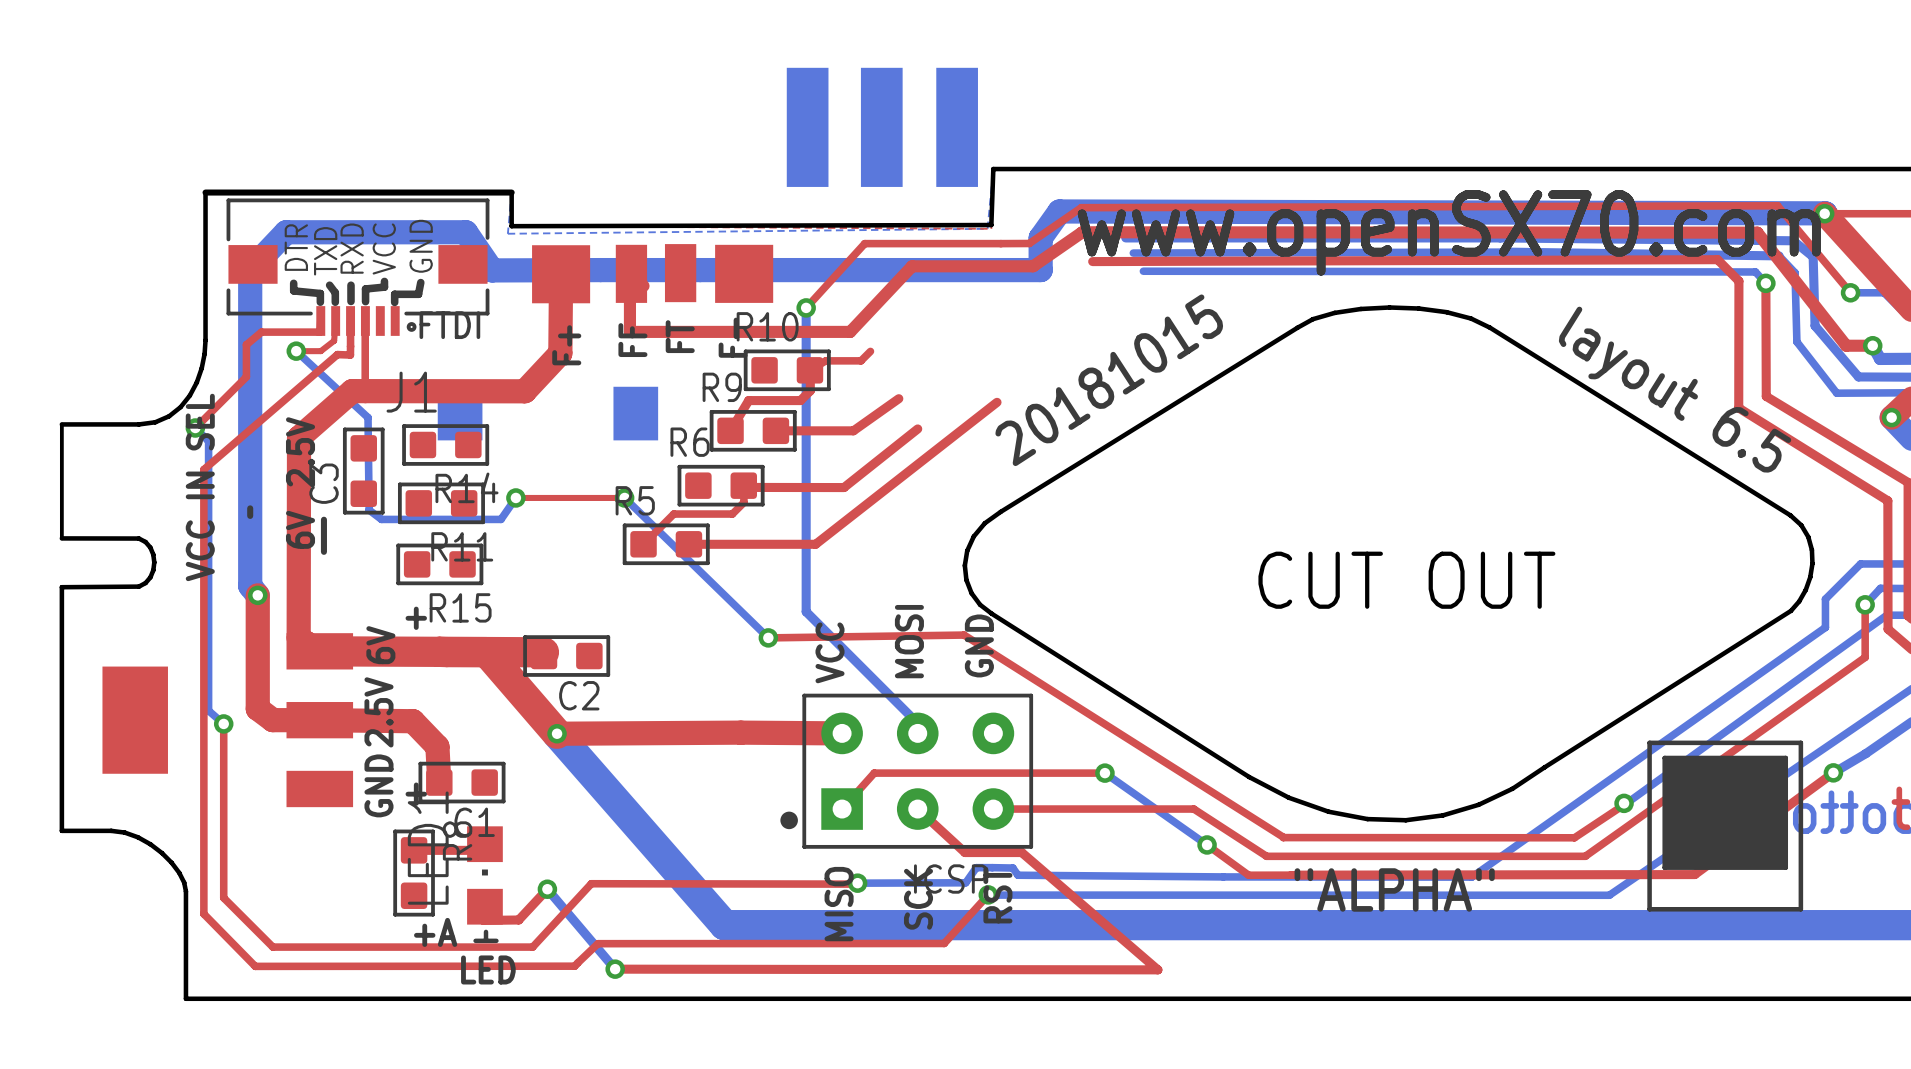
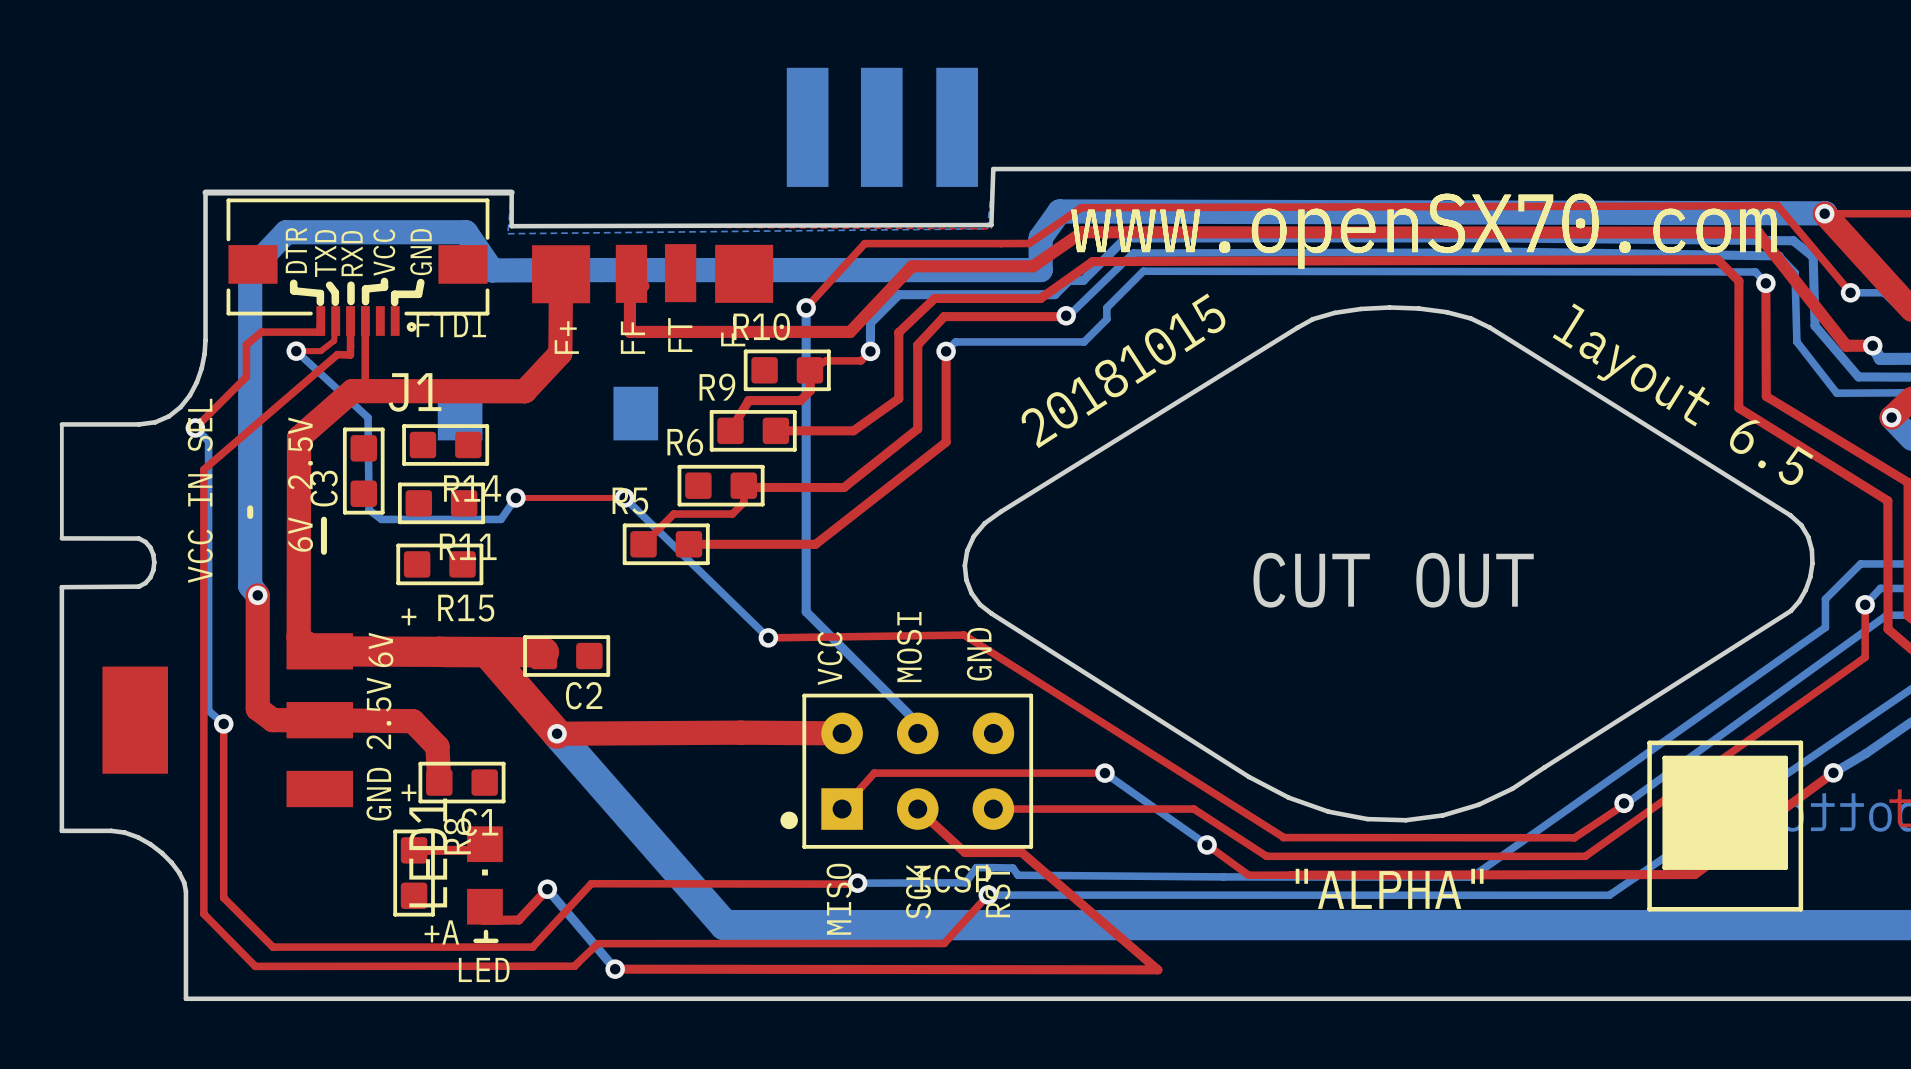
bottom track: none -> (1125, 237) (1083, 280) (1069, 280) (1054, 294) (898, 294) (870, 323) (870, 351)
bottom track: none -> (1133, 253) (1070, 313) (1066, 315)
top track: none -> (1092, 261) (1040, 298) (934, 298) (898, 332) (898, 398)
bottom track: none -> (1143, 271) (1106, 307) (1106, 319) (1084, 341) (955, 341) (946, 351)
top track: none -> (1066, 315) (944, 316) (917, 344) (917, 428)
via: none -> (1066, 315)
via: none -> (870, 351)
via: none -> (946, 351)
top track: (997, 402) (946, 442) -> (946, 351) (946, 442)

